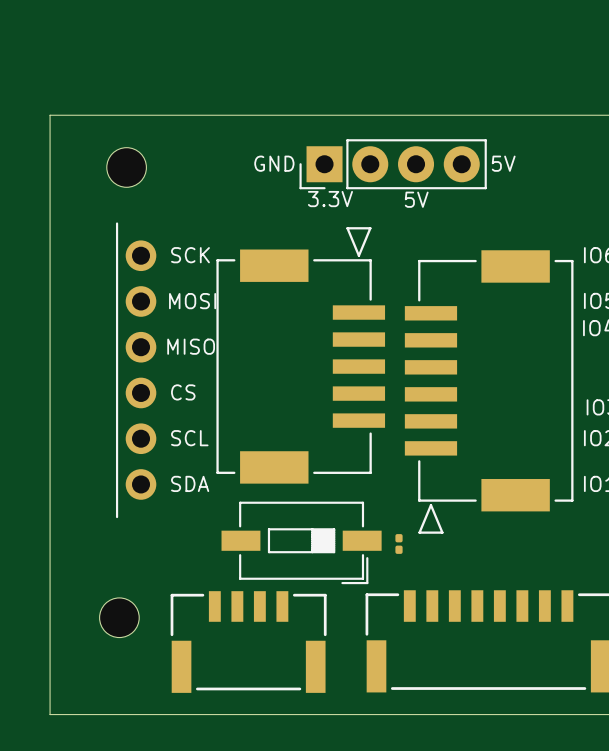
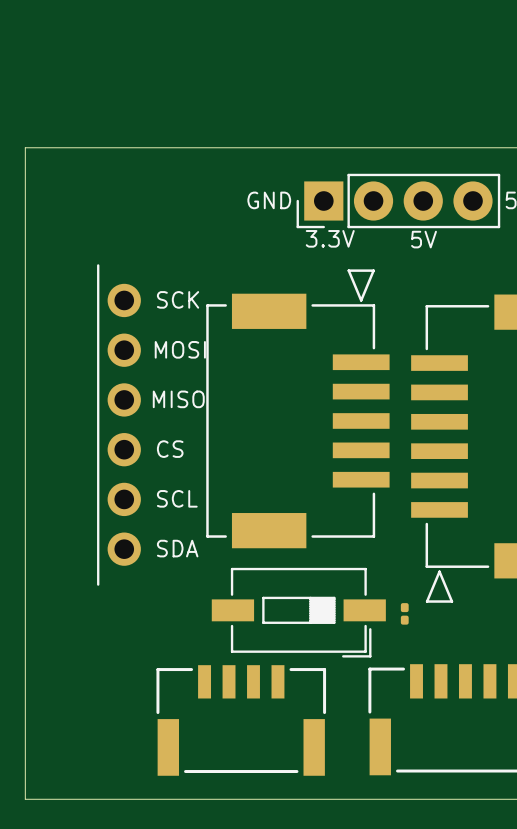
part: (126, 167) -> none
part: (119, 617) -> none

